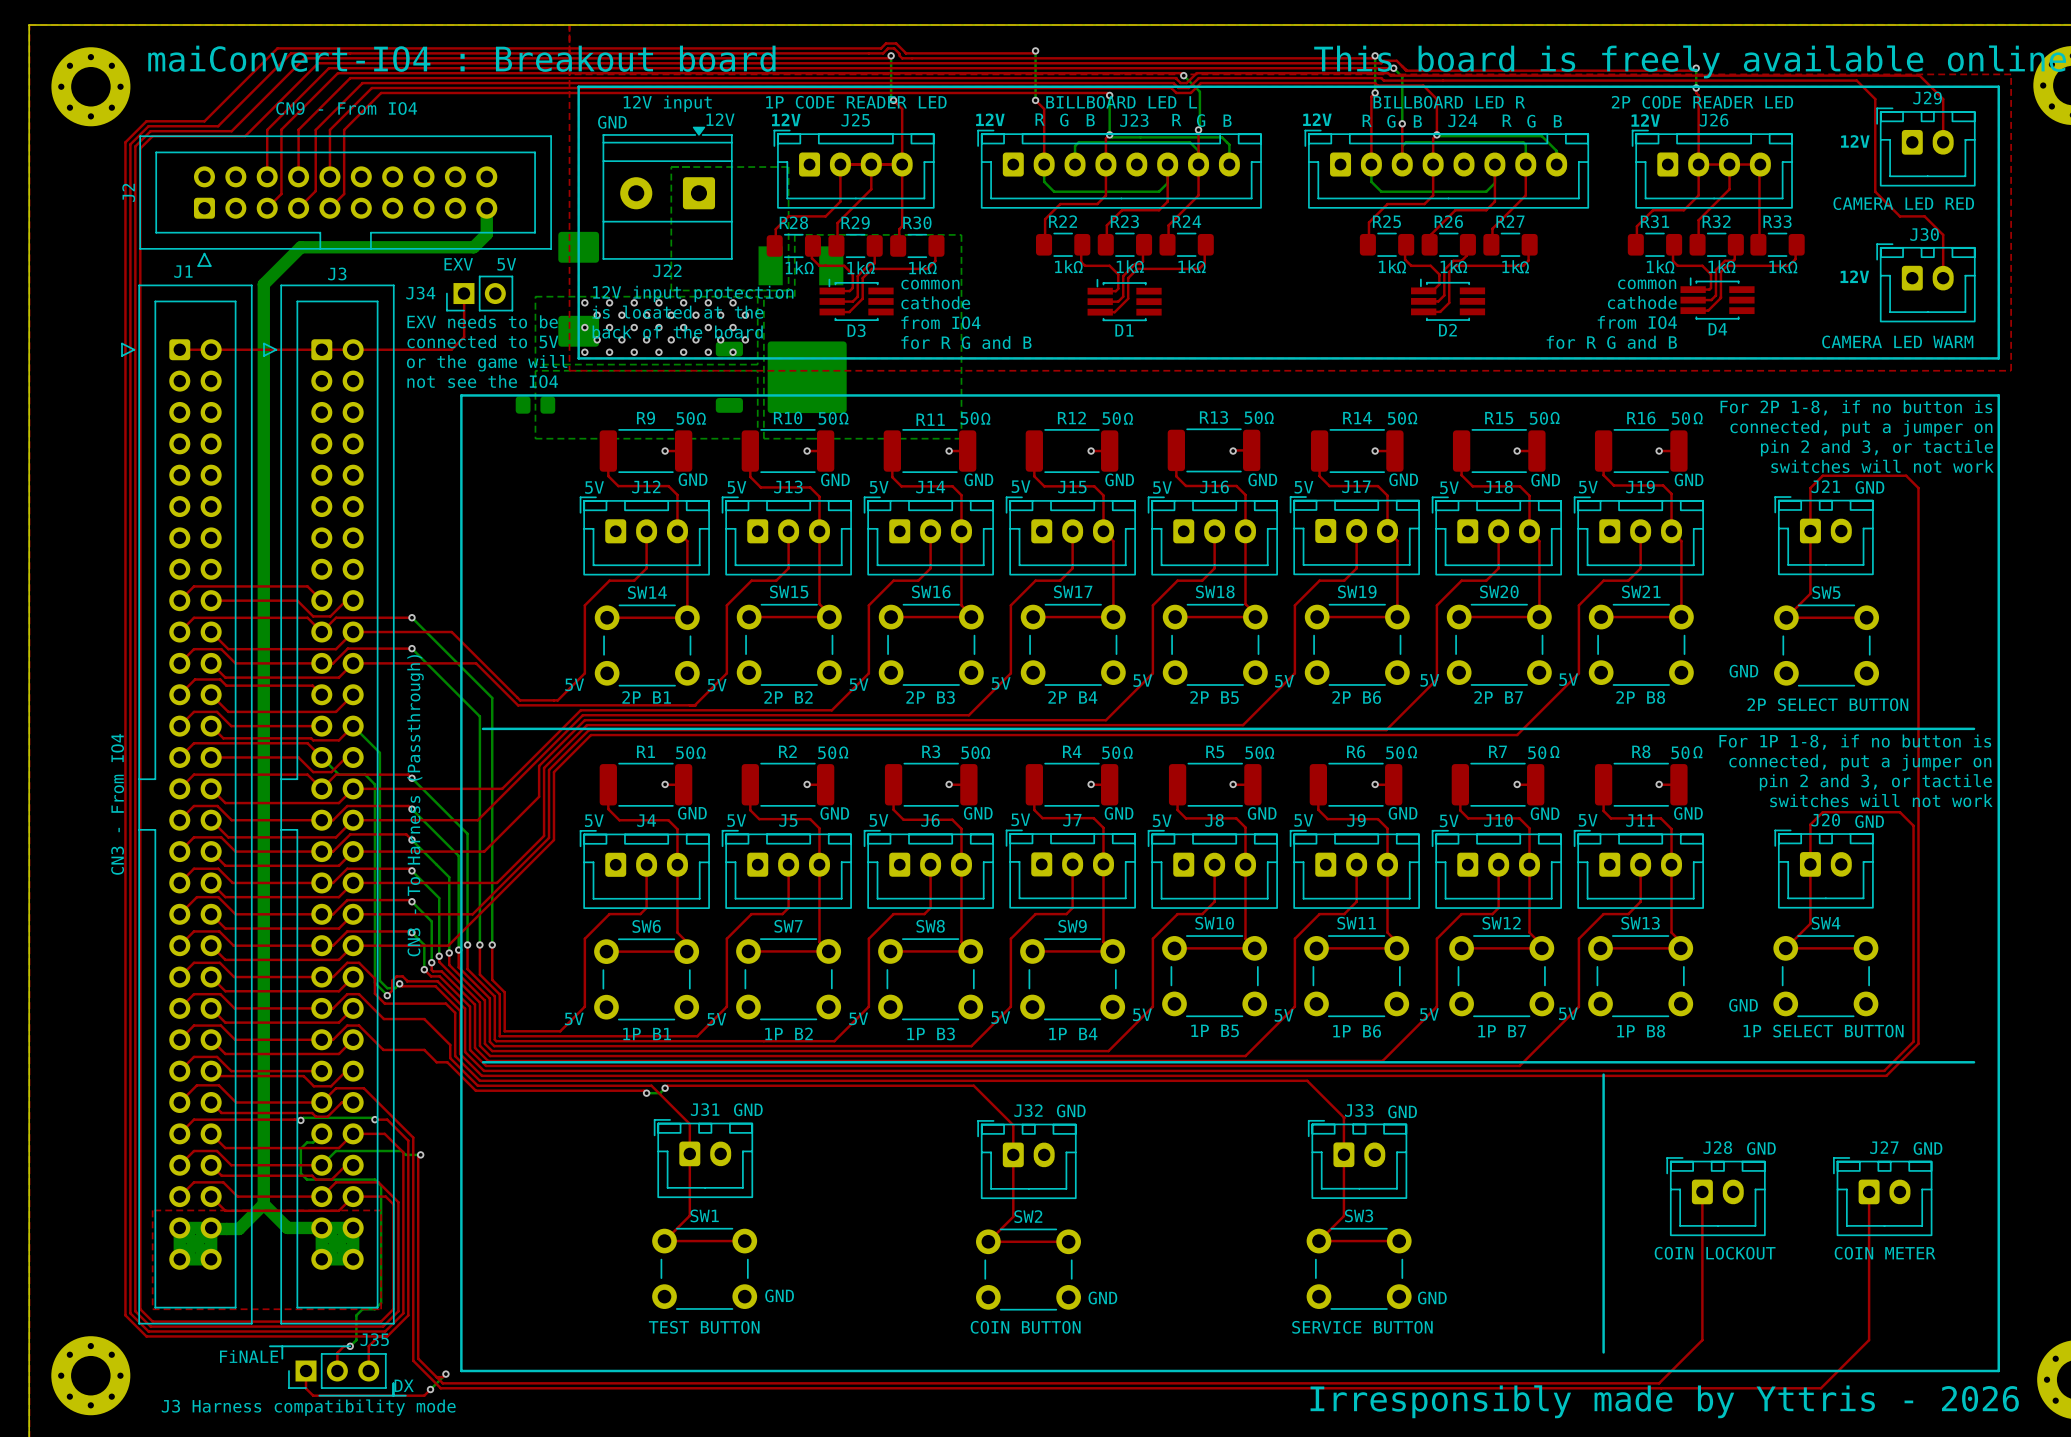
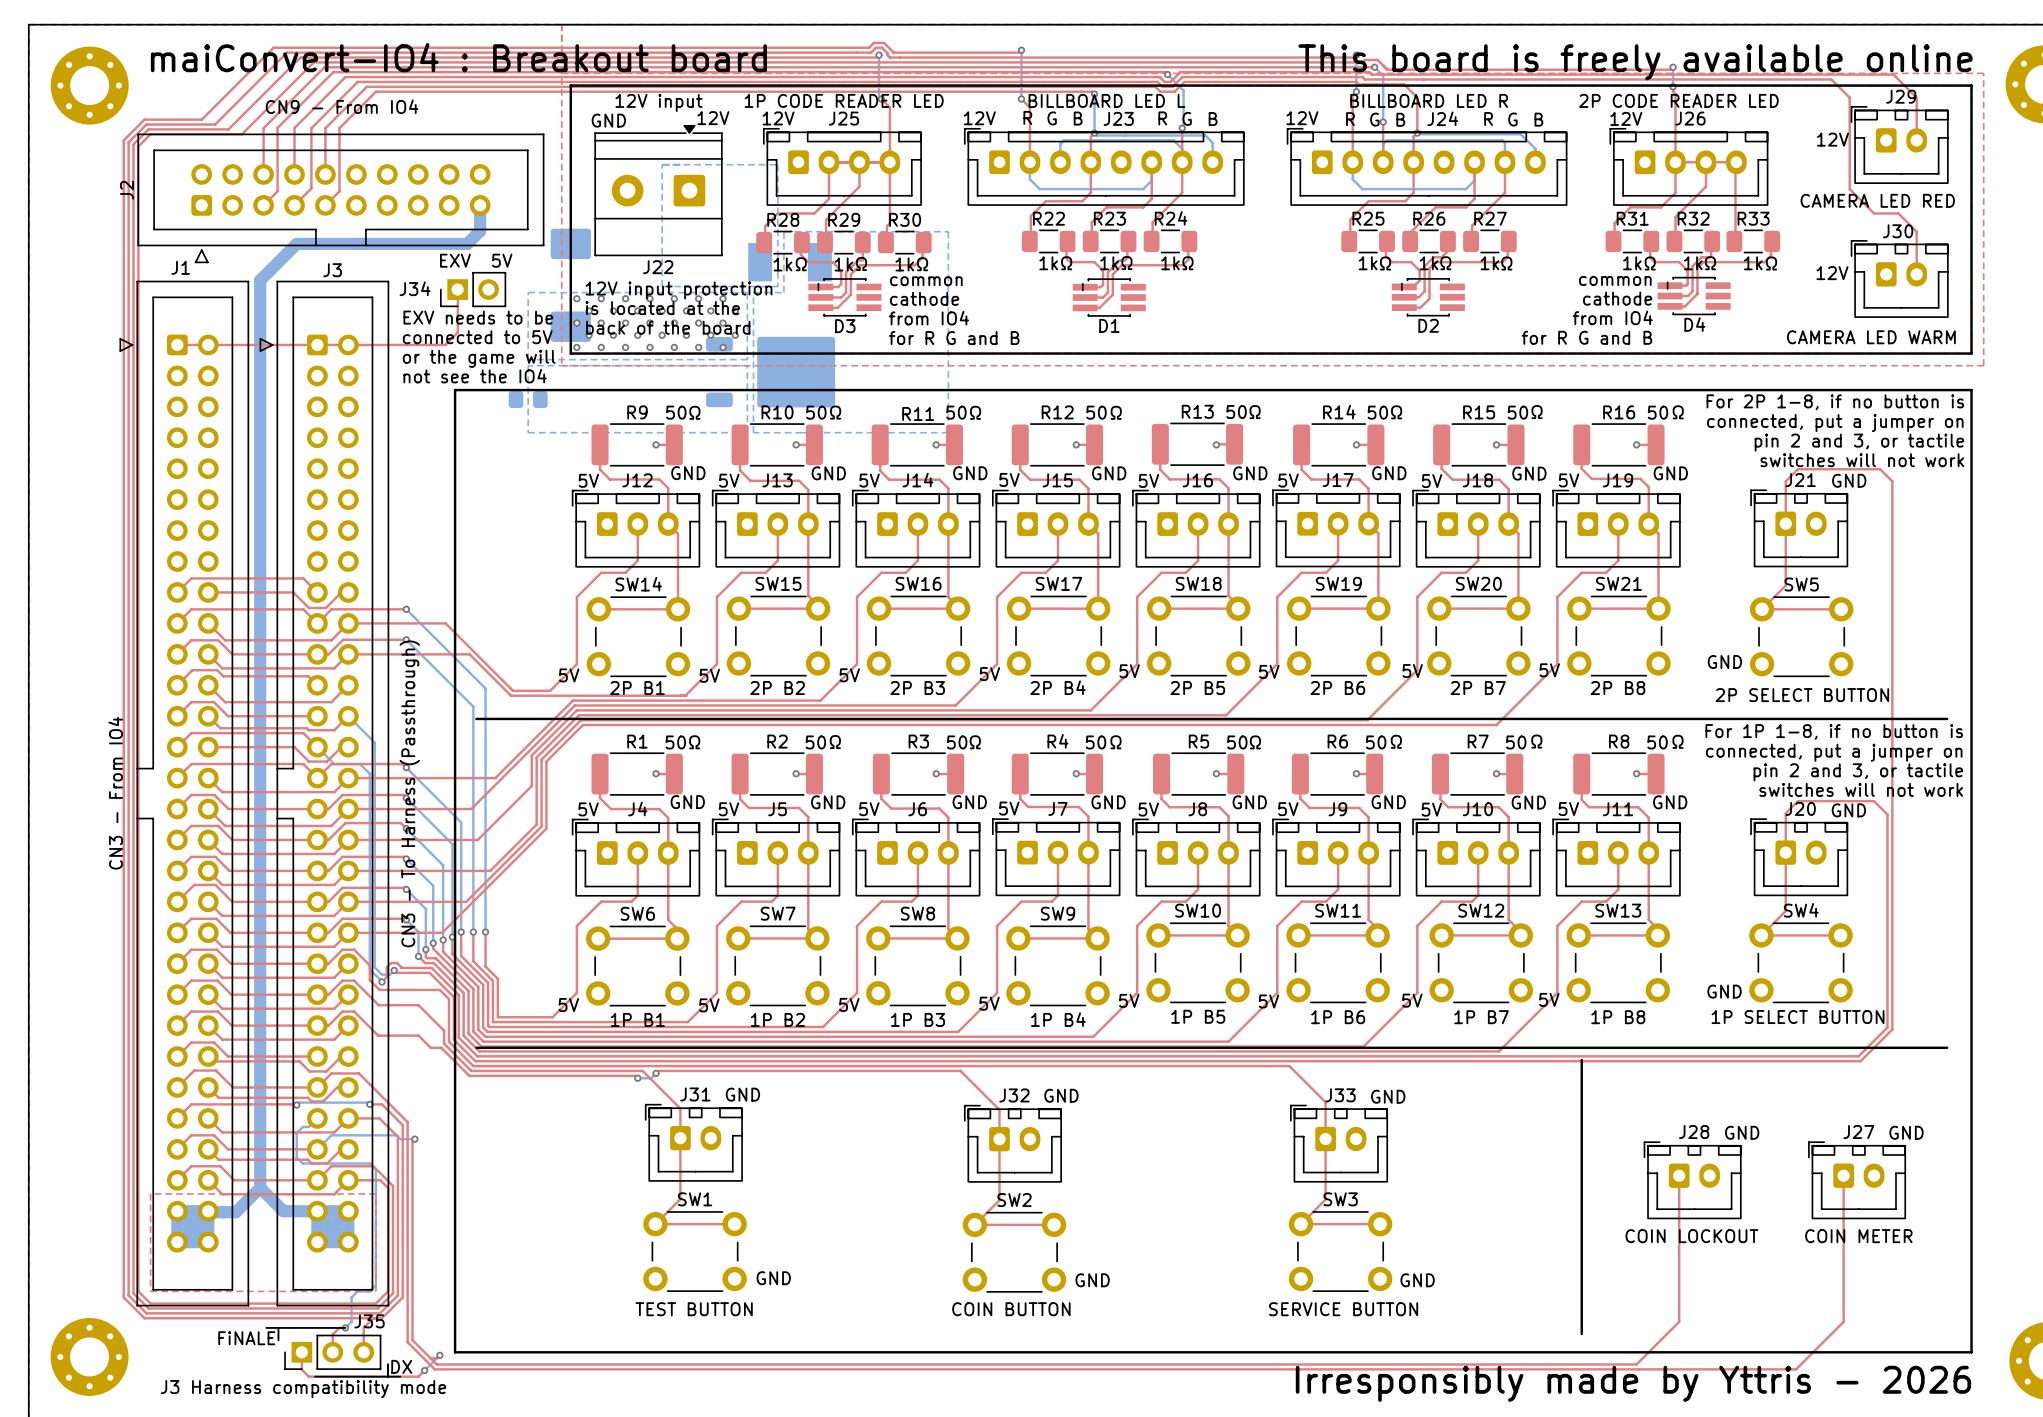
D4 footprint: [1680, 277, 1755, 320] -> [1657, 276, 1731, 316]
D3 footprint: [819, 278, 894, 321] -> [808, 278, 882, 317]
D2 footprint: [1411, 278, 1486, 321] -> [1391, 278, 1465, 317]
D1 footprint: [1087, 279, 1162, 322] -> [1072, 278, 1146, 317]

